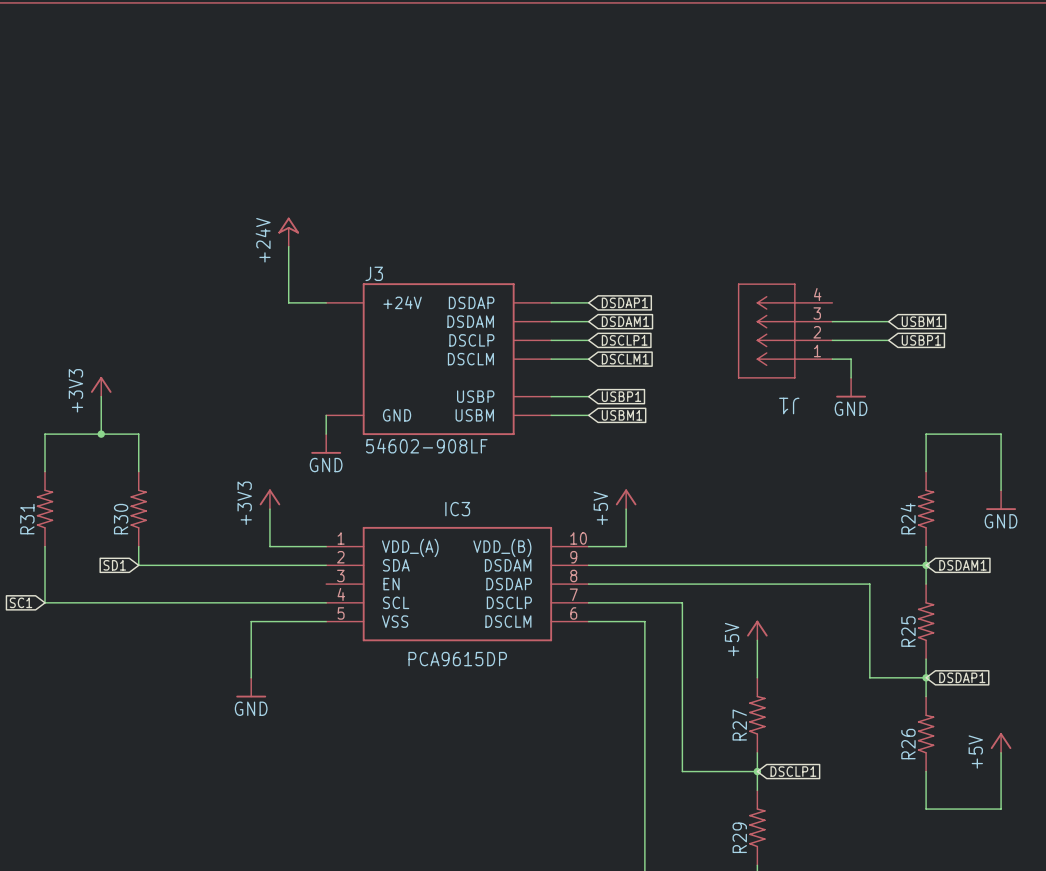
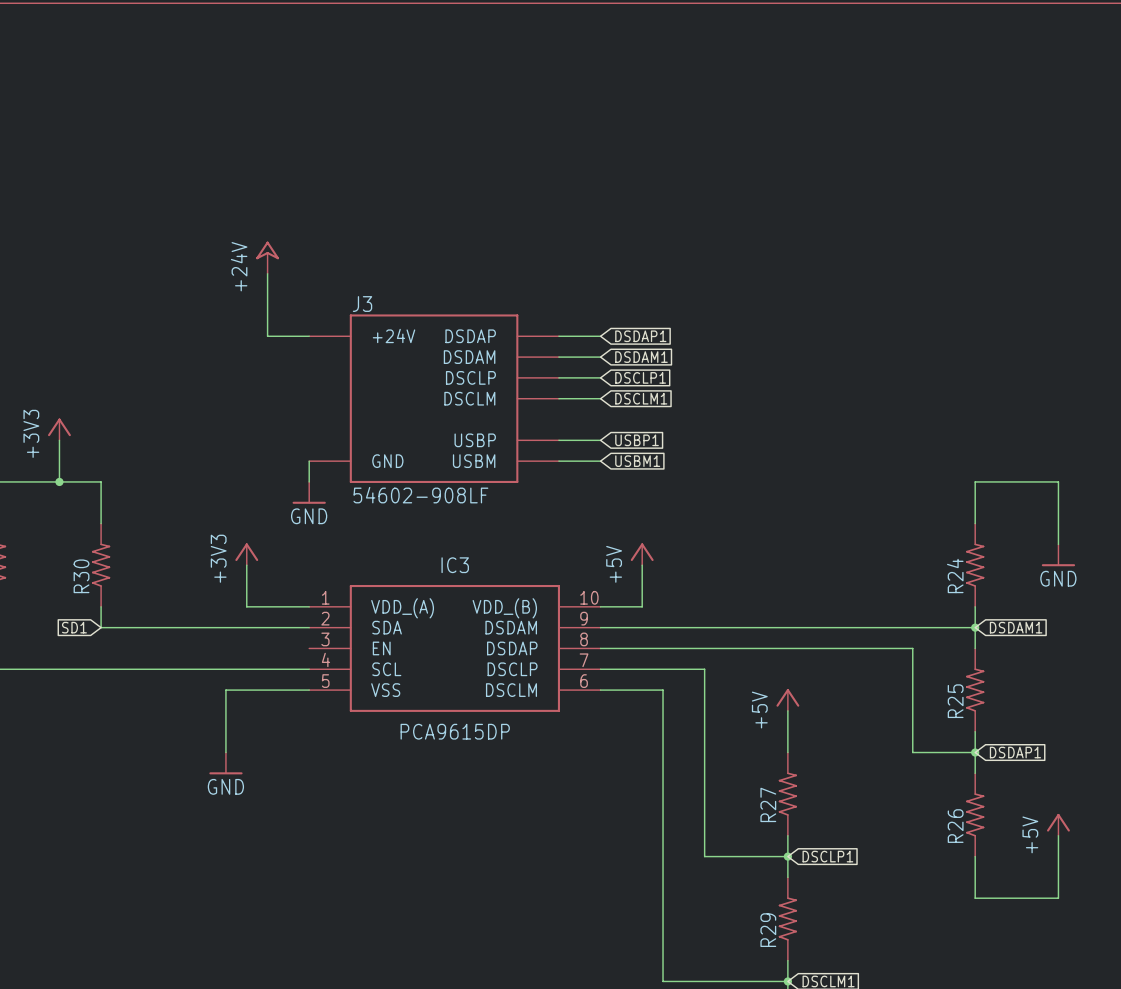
wire: (832, 321) (888, 321) -> none
global label: USBM1 (922, 321) -> none
J1: (785, 331) -> none
wire: (832, 340) (888, 340) -> none
global label: USBP1 (921, 340) -> none
wire: (832, 359) (851, 359) (851, 377) -> none
power symbol: GND (851, 387) -> none

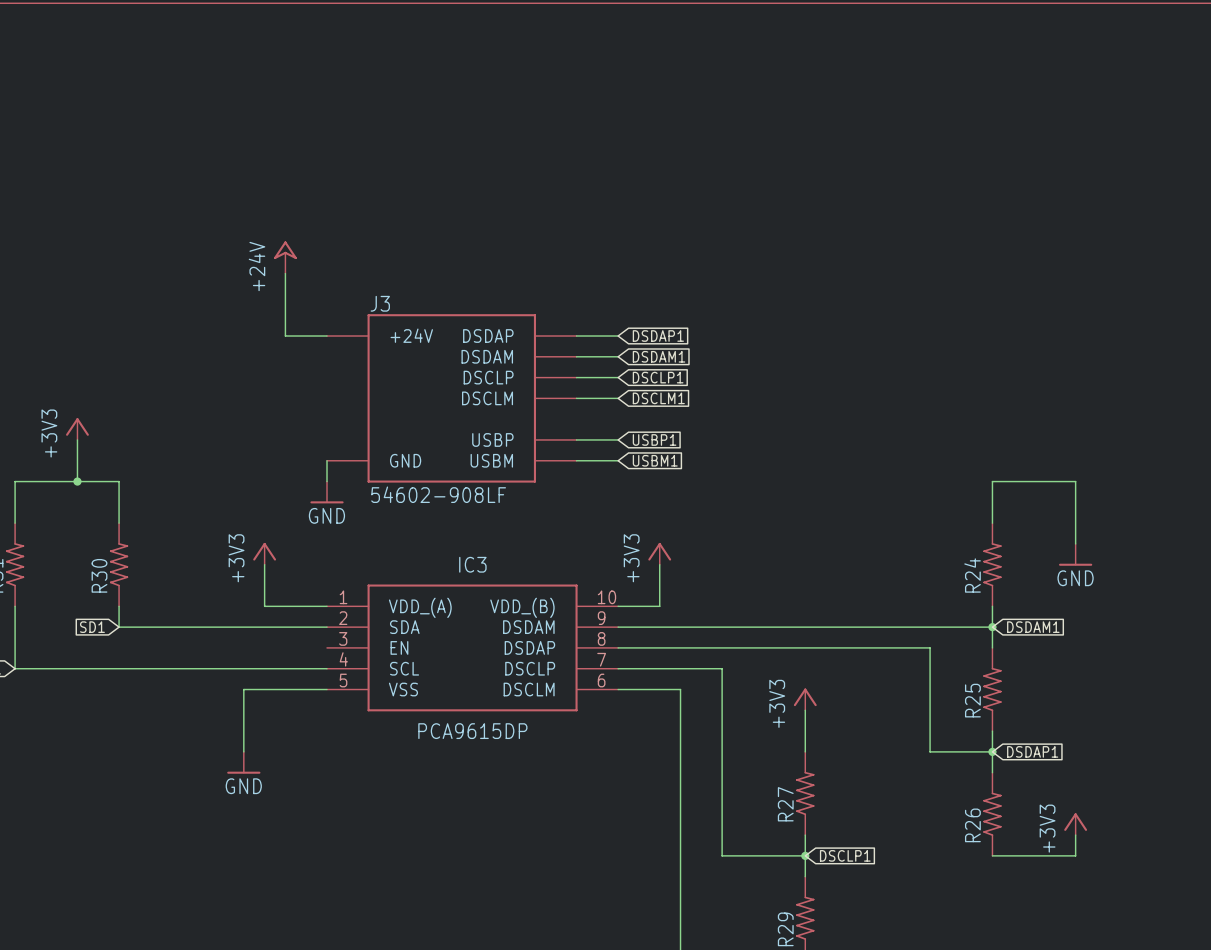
power symbol: +5V (642, 554) -> +3V3 (659, 553)
power symbol: +5V (787, 699) -> +3V3 (805, 699)
power symbol: +5V (1058, 824) -> +3V3 (1075, 824)
wire: (975, 856) (975, 898) (1058, 898) (1058, 856) -> (992, 855) (1075, 855)

